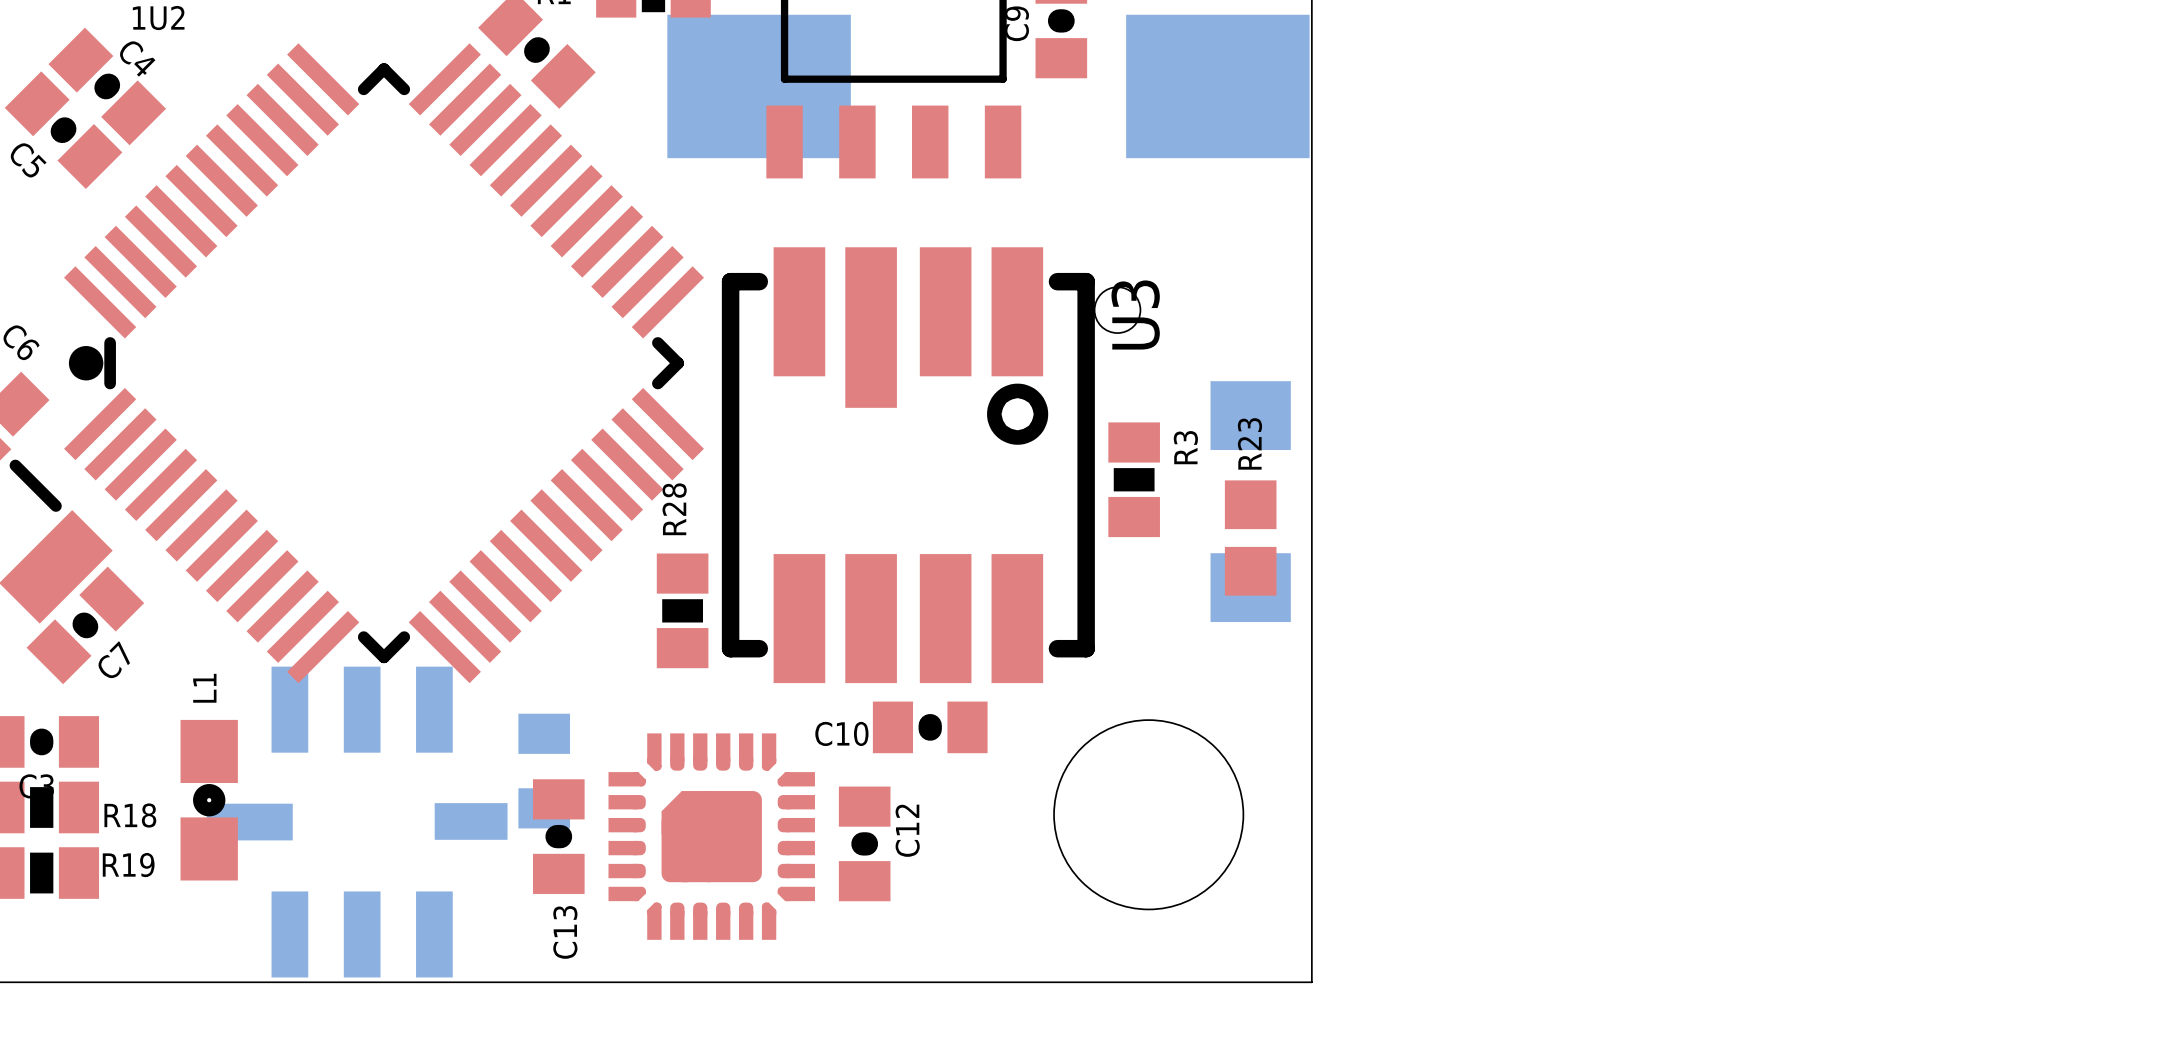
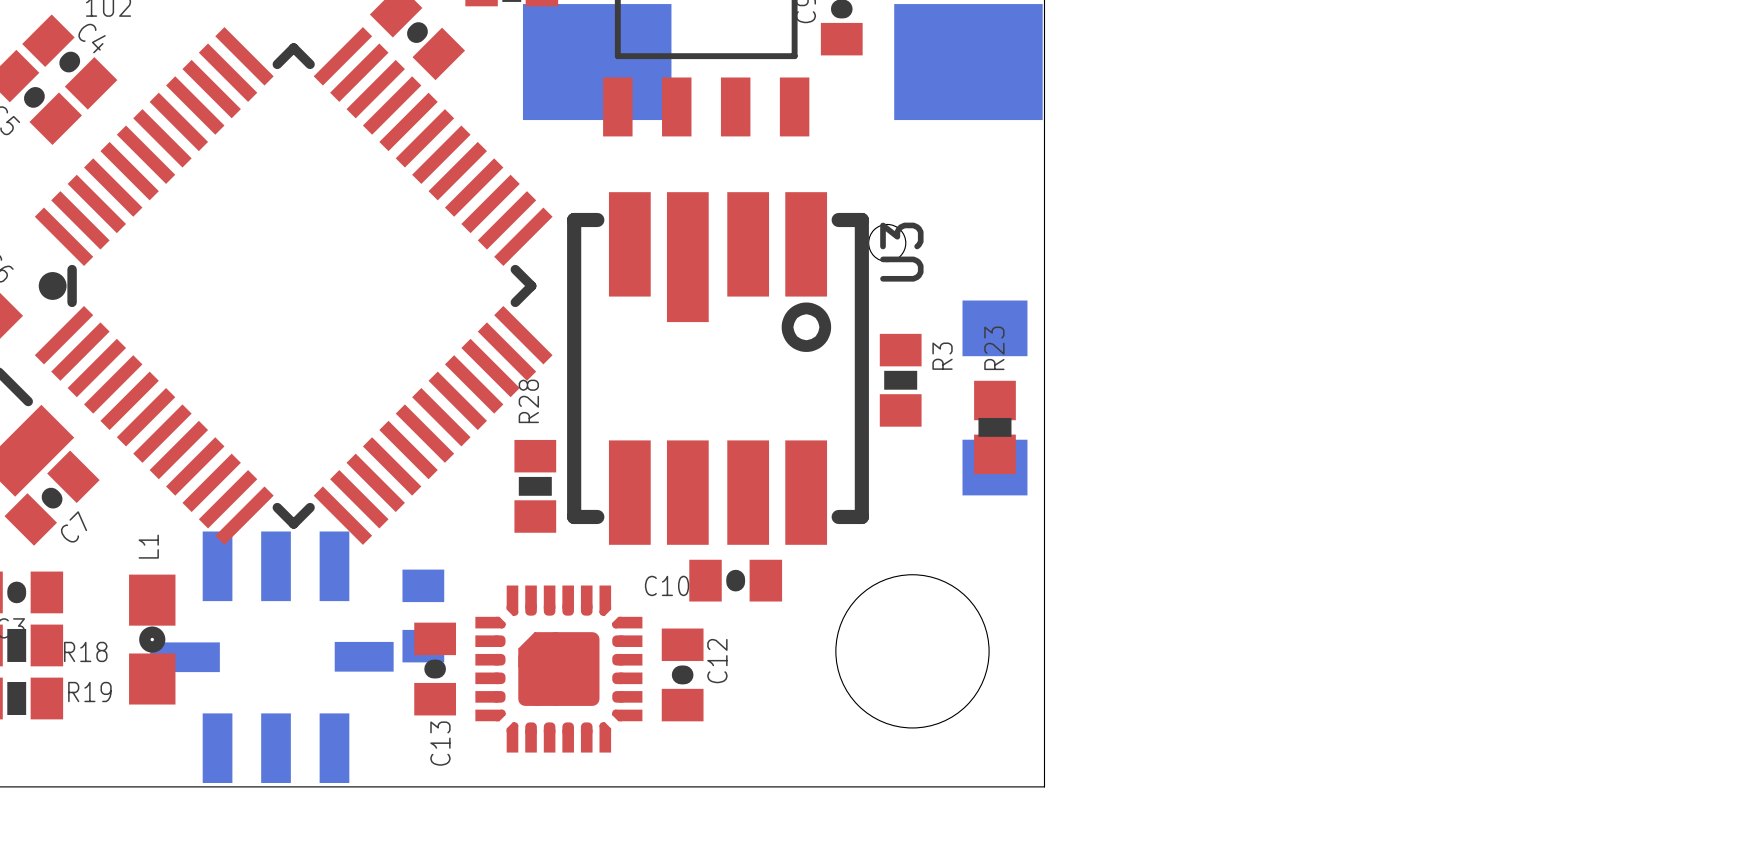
R23 footprint: [1224, 480, 1277, 596] -> [974, 380, 1016, 475]

